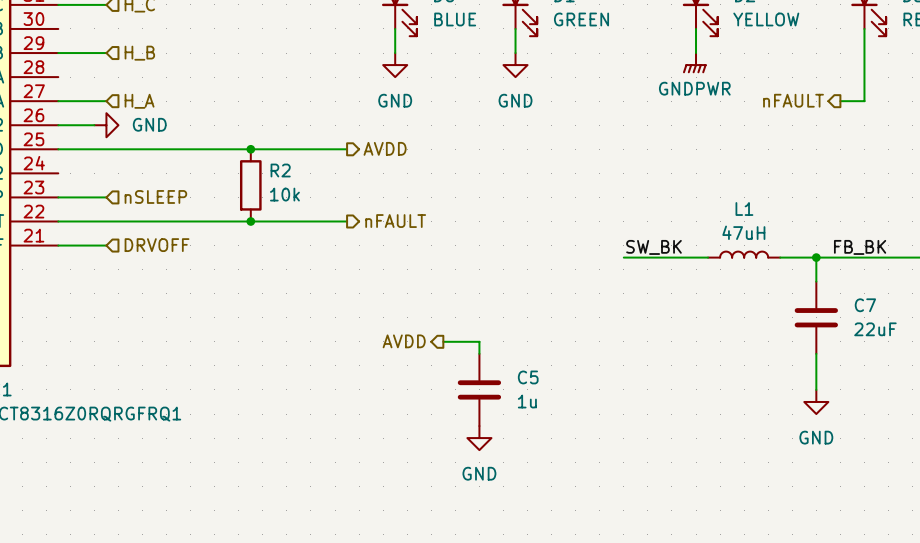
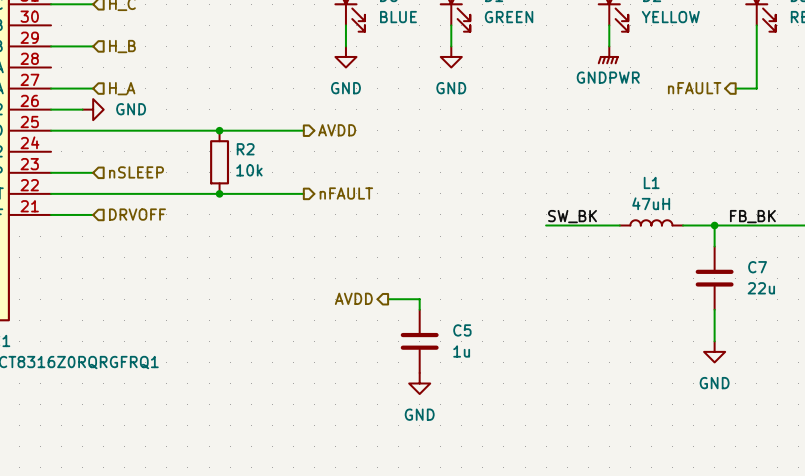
C7 value: 22uF (875, 329) -> 22u (761, 288)

